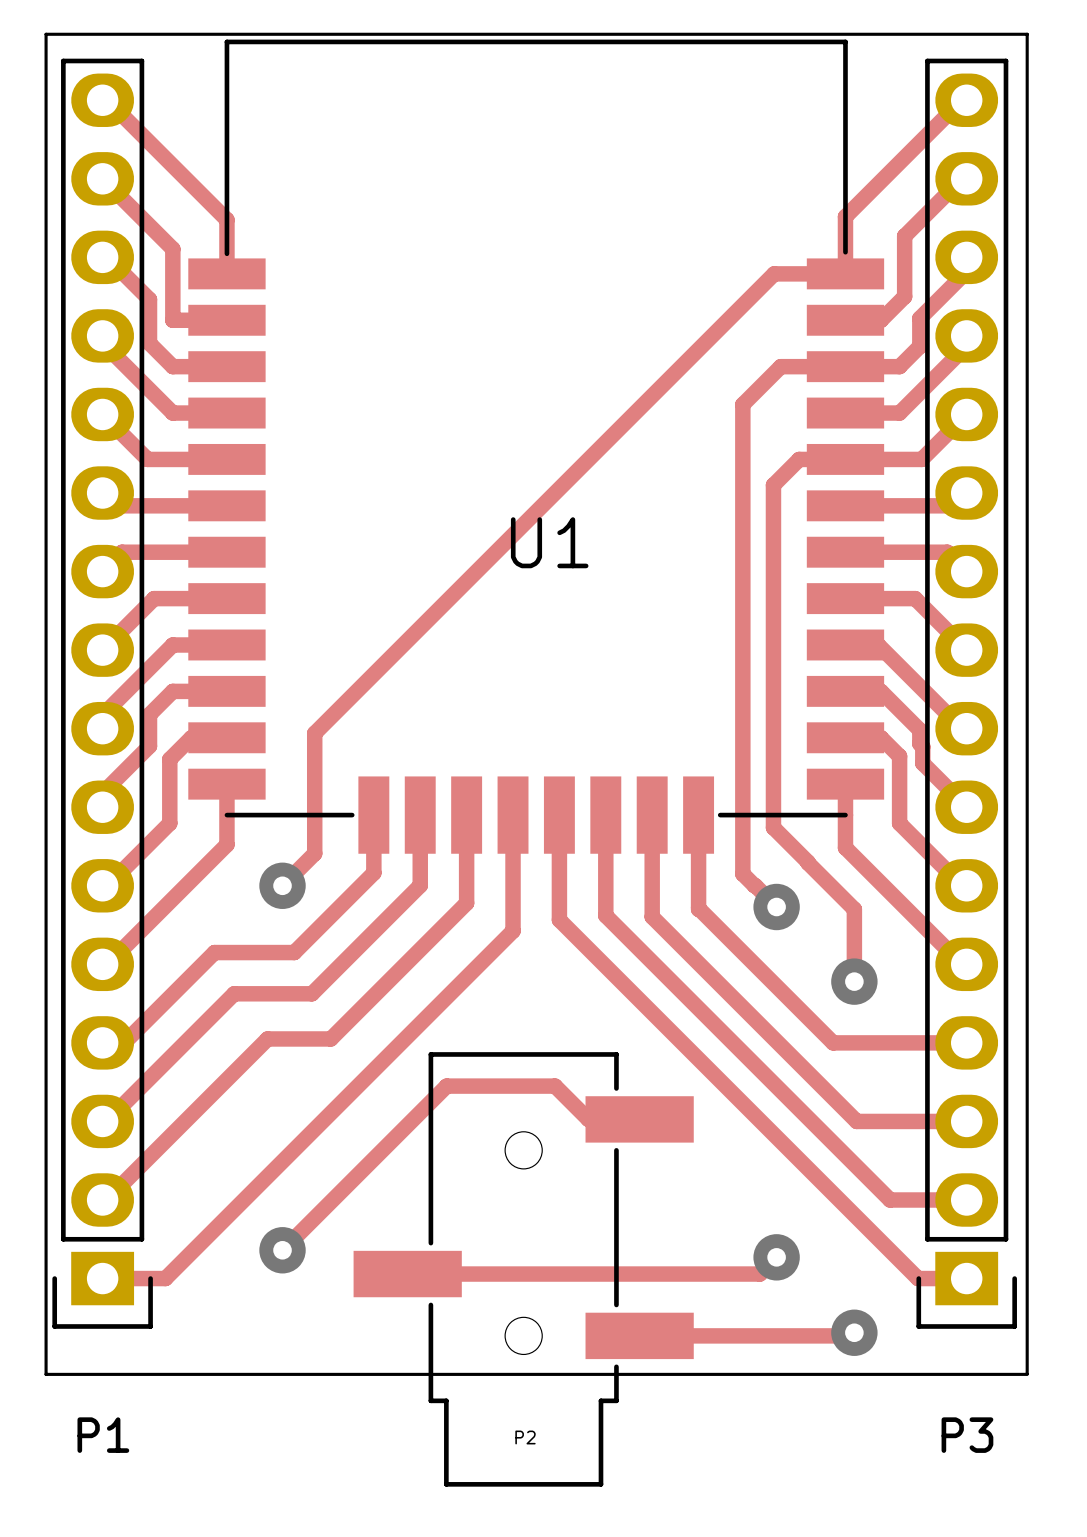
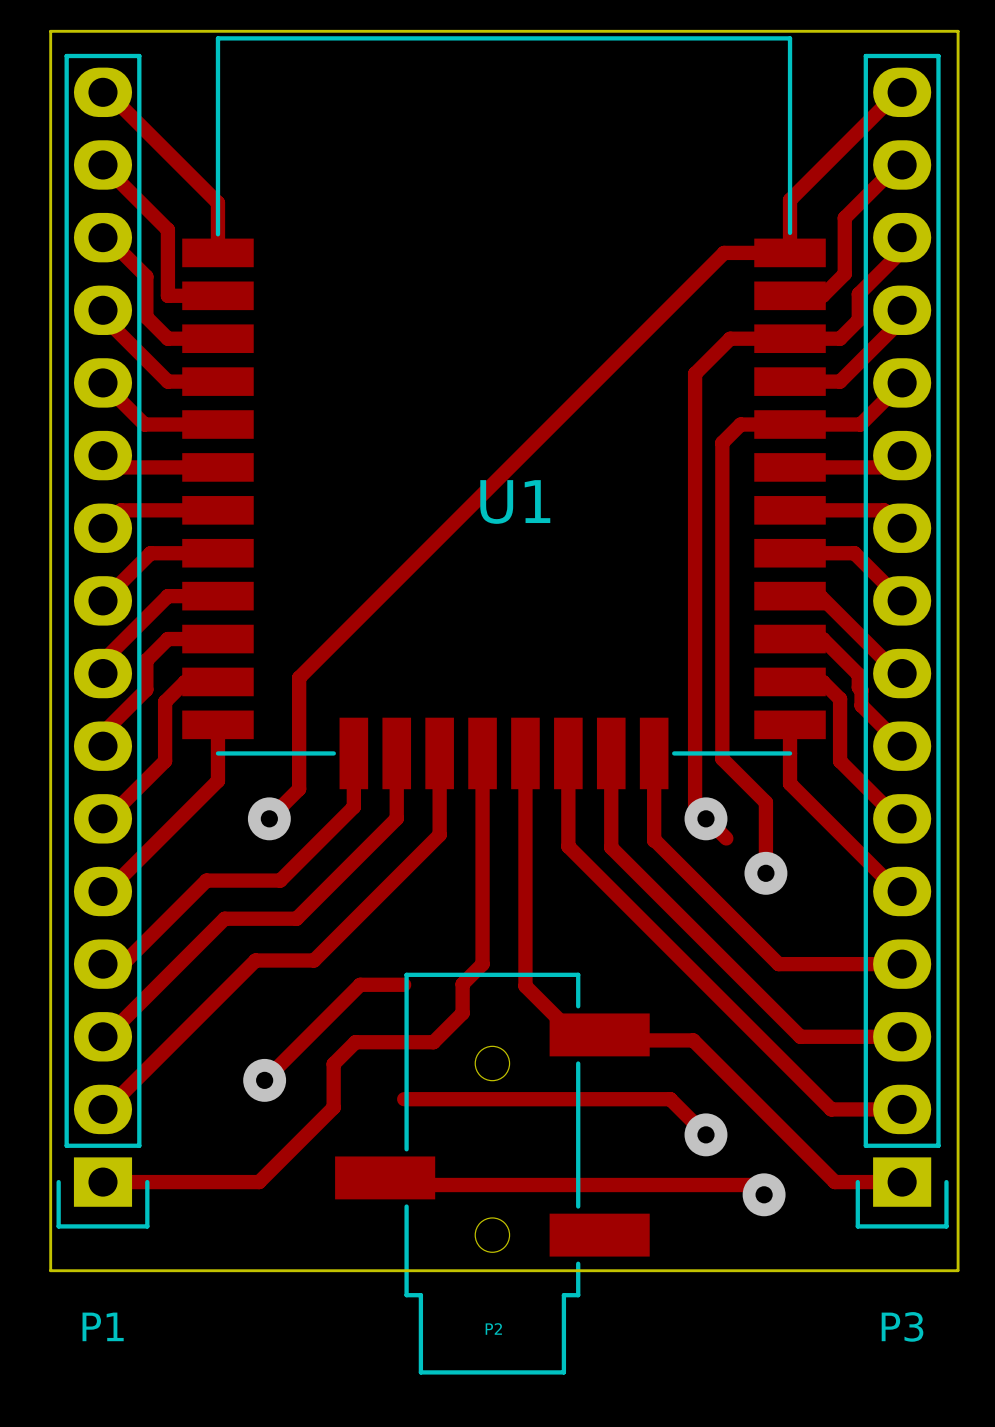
track: (799, 459) (773, 485) (773, 827) (854, 909) (854, 981) -> (747, 424) (740, 424) (722, 442) (722, 758) (765, 802) (765, 873)
via: none -> (705, 818)
via: (776, 907) -> none
track: (559, 919) (918, 1278) -> (525, 850) (525, 986) (579, 1040) (693, 1040) (834, 1182) (857, 1182)
track: (513, 931) (165, 1278) -> (482, 860) (482, 964) (462, 984) (462, 1013) (433, 1042) (355, 1042) (333, 1064) (333, 1107) (259, 1182) (161, 1182)
via: none -> (765, 873)
via: (854, 981) -> none
track: none -> (404, 984) (360, 984) (264, 1080)
track: (639, 1119) (588, 1119) (555, 1086) (446, 1086) (282, 1250) -> none
track: none -> (404, 1099) (670, 1099) (705, 1134)
via: none -> (705, 1134)
via position: (282, 1250) -> (264, 1080)
track: (776, 1257) (759, 1274) (407, 1274) -> none
via: (776, 1257) -> none
track: none -> (404, 1185) (754, 1185) (764, 1194)
via: none -> (764, 1194)
track: (854, 1332) (851, 1335) (639, 1335) -> none
via: (854, 1332) -> none

